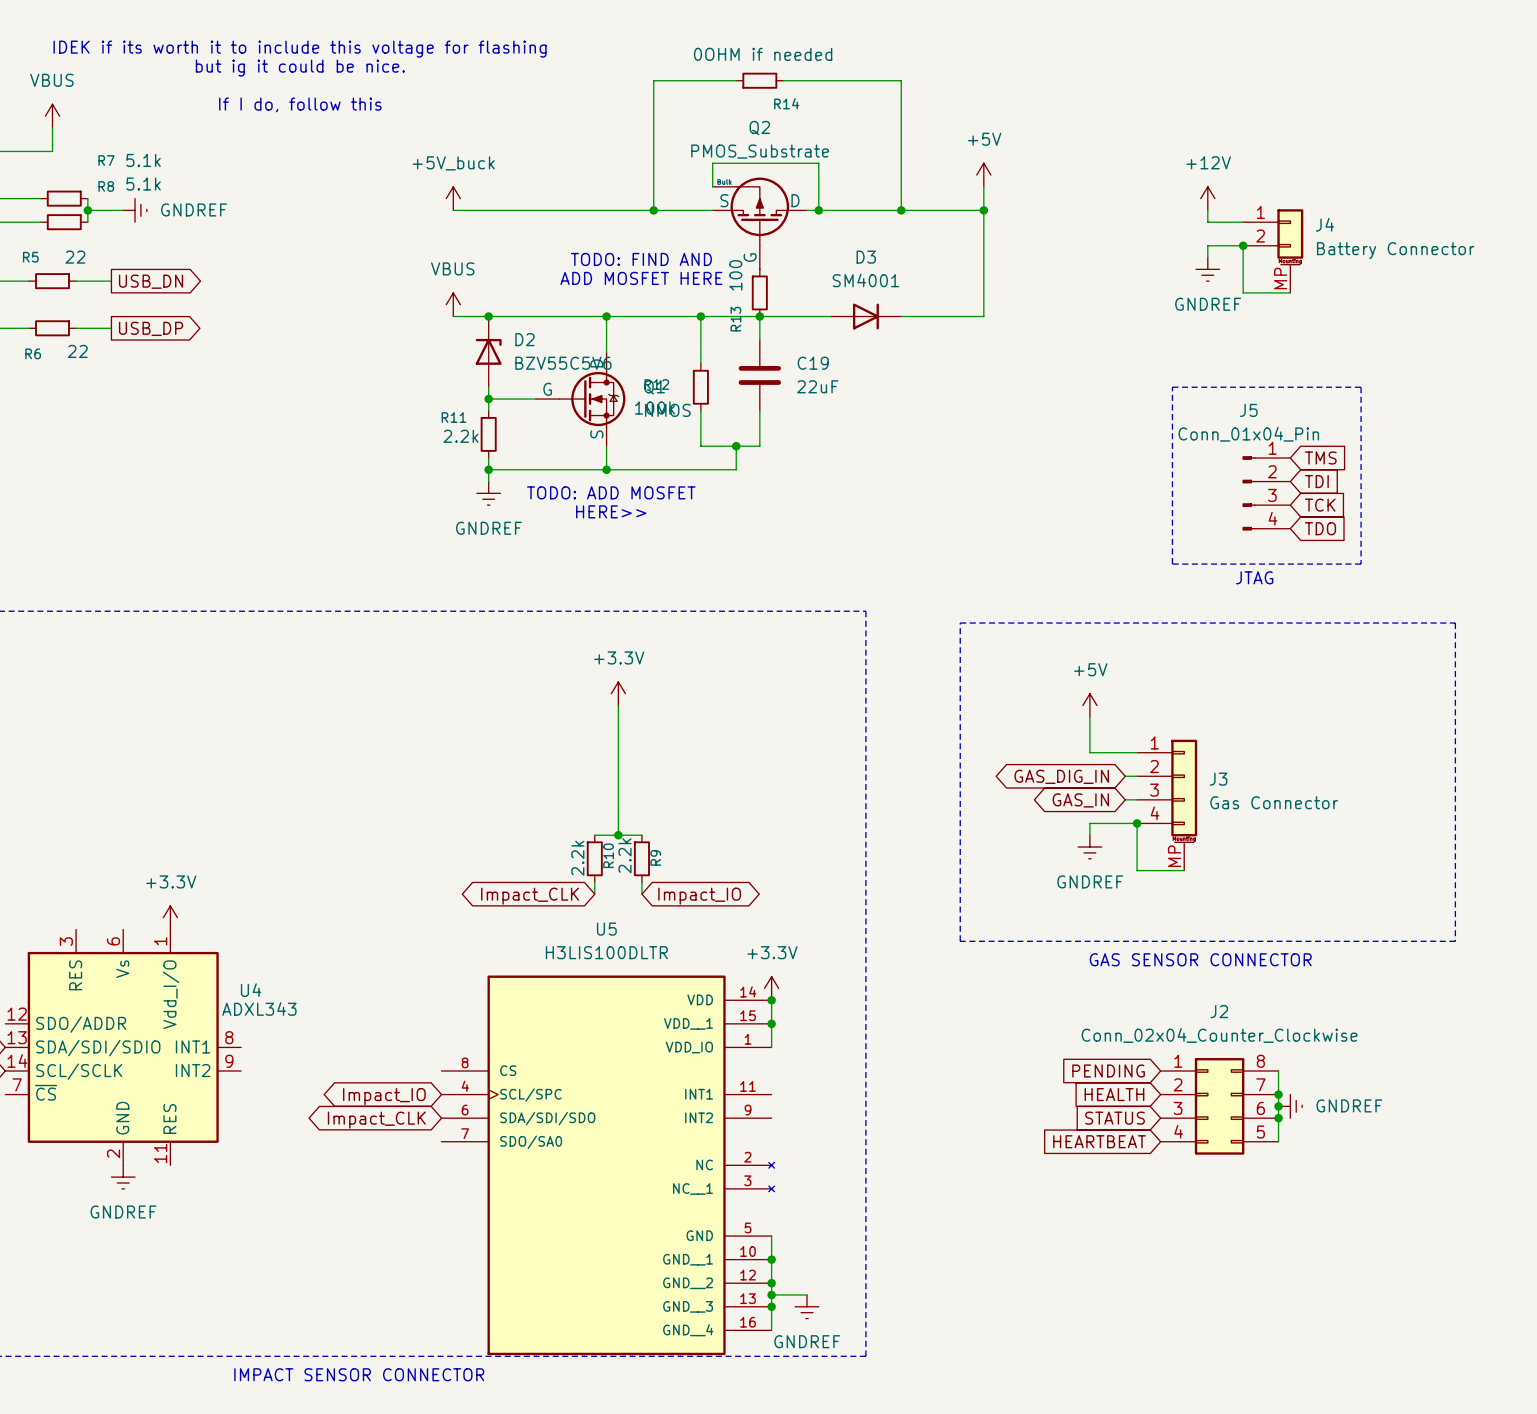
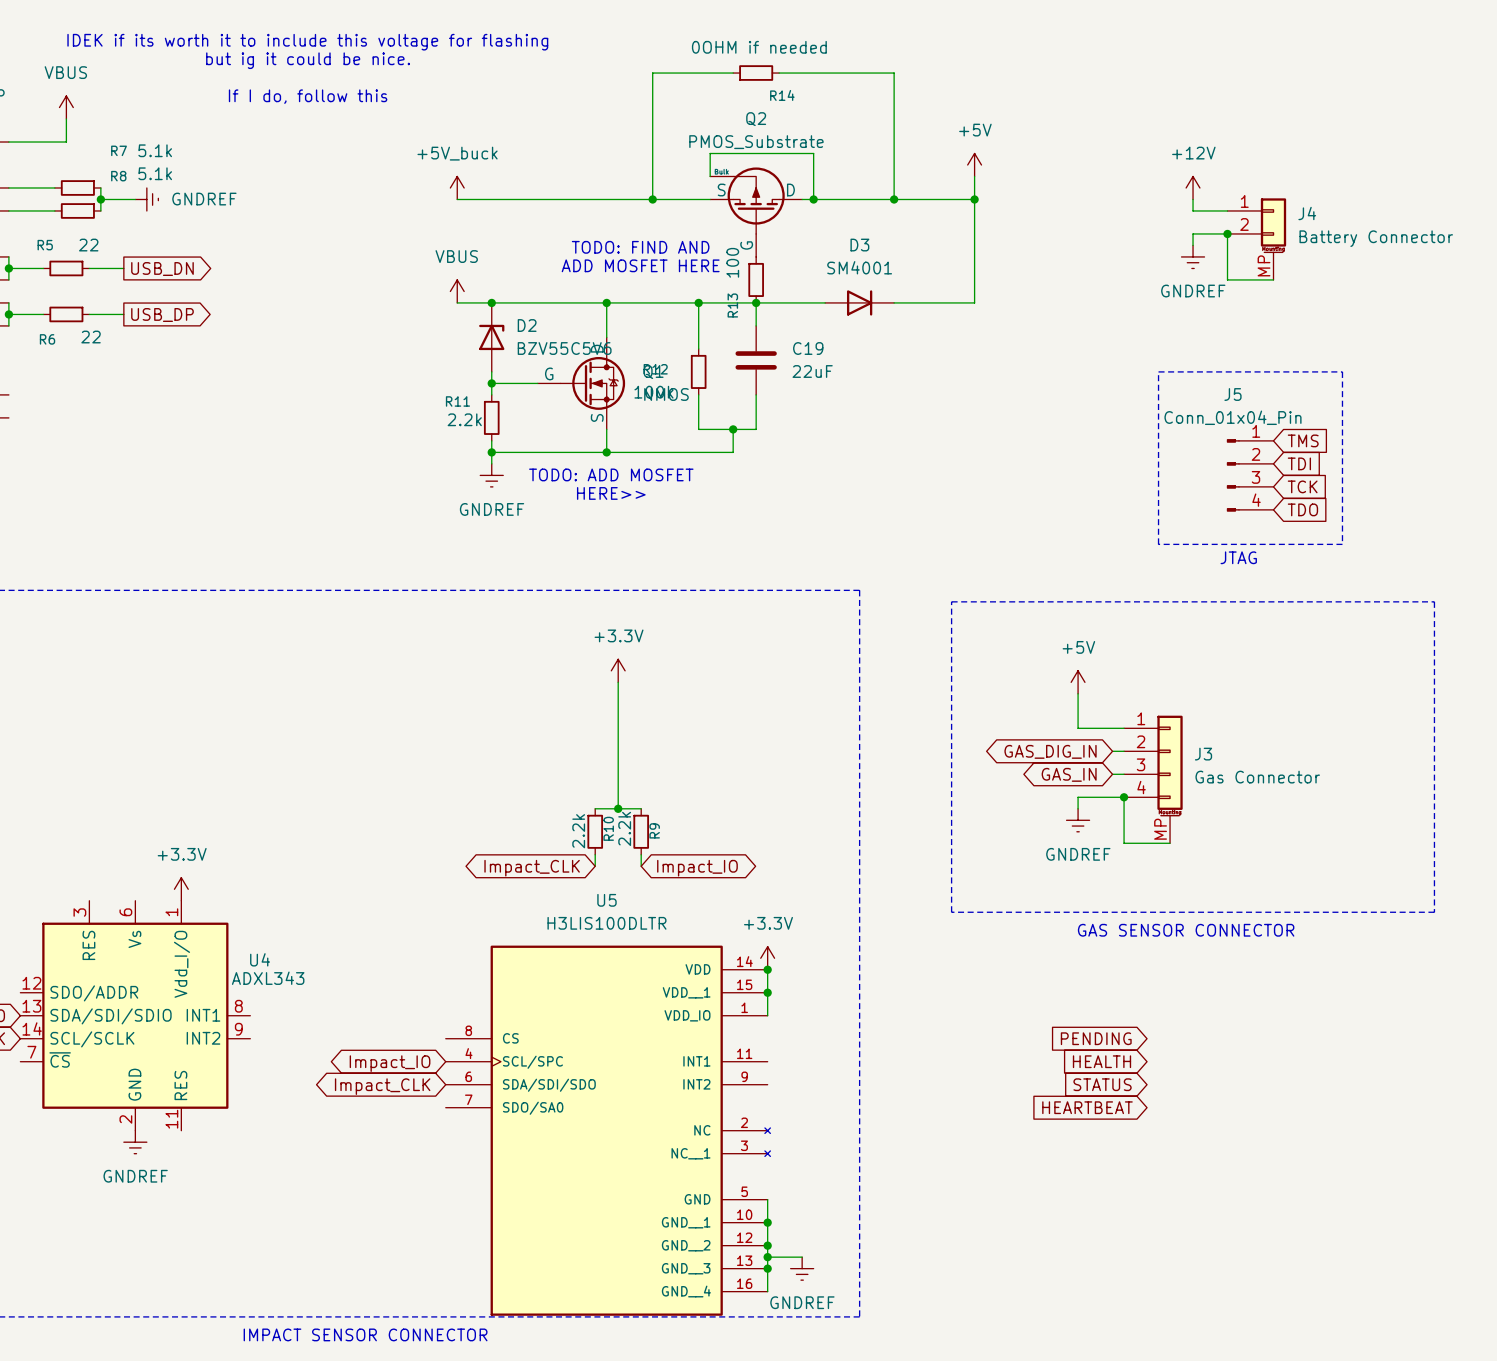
wire: (1278, 1071) (1278, 1141) -> none
junction: (1278, 1094) -> none
J2: Conn_02x04_Counter_Clockwise (1219, 1106) -> none
junction: (1278, 1106) -> none
power symbol: GNDREF (1290, 1106) -> none
junction: (1278, 1118) -> none

